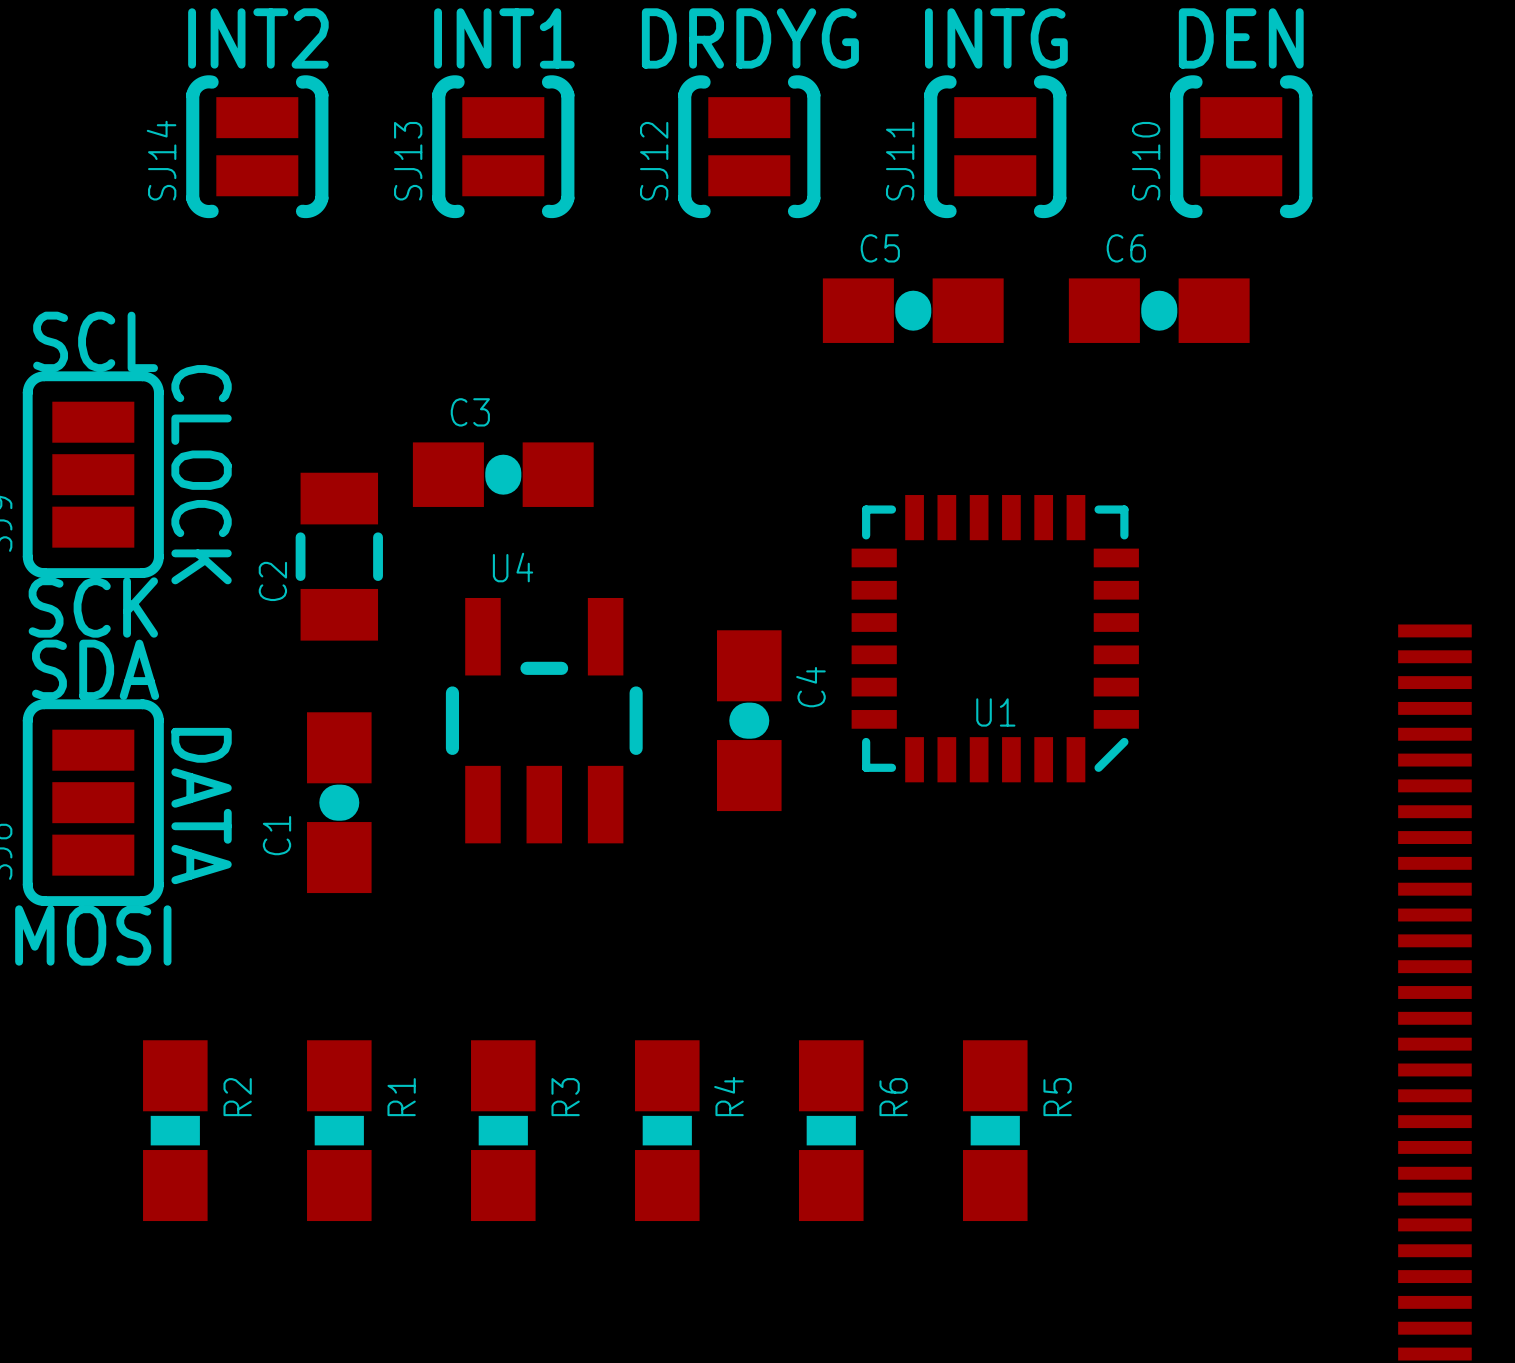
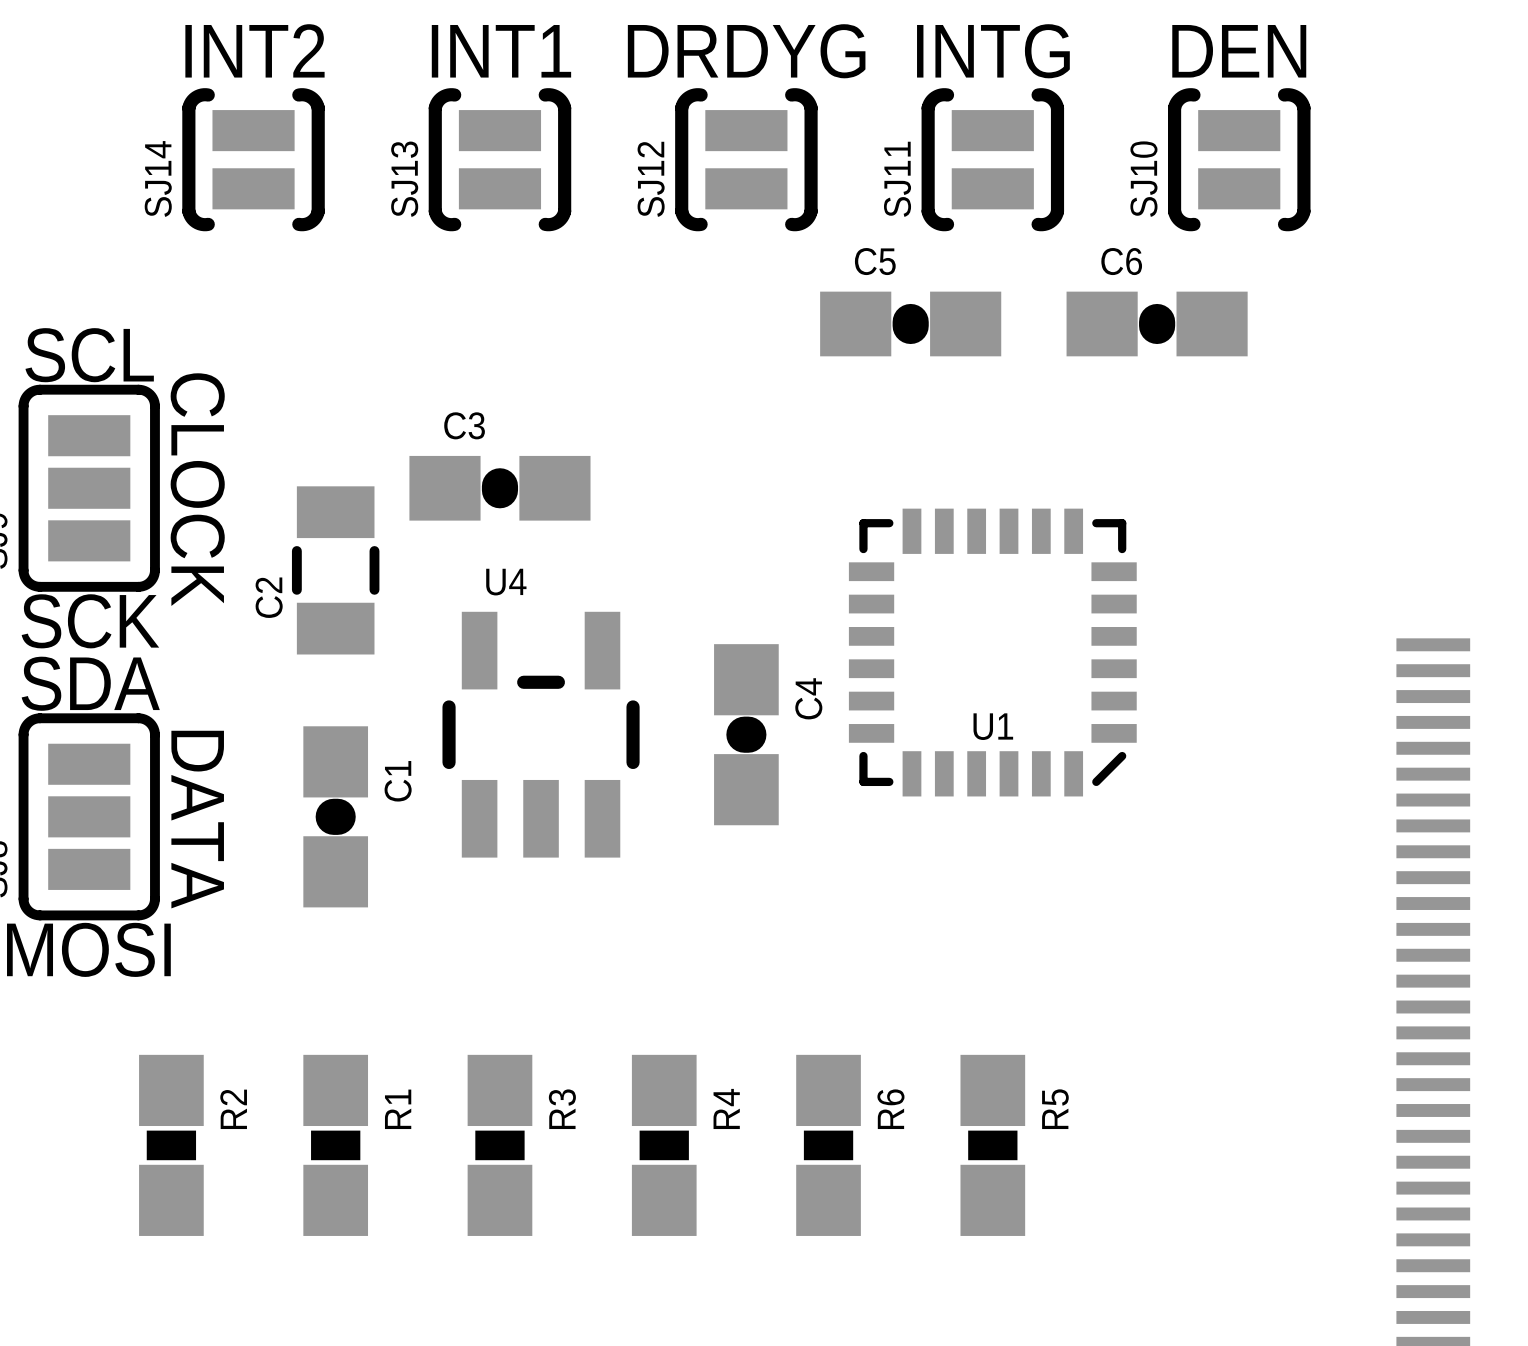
C1 name position: C1 (276, 835) -> C1 (398, 781)

